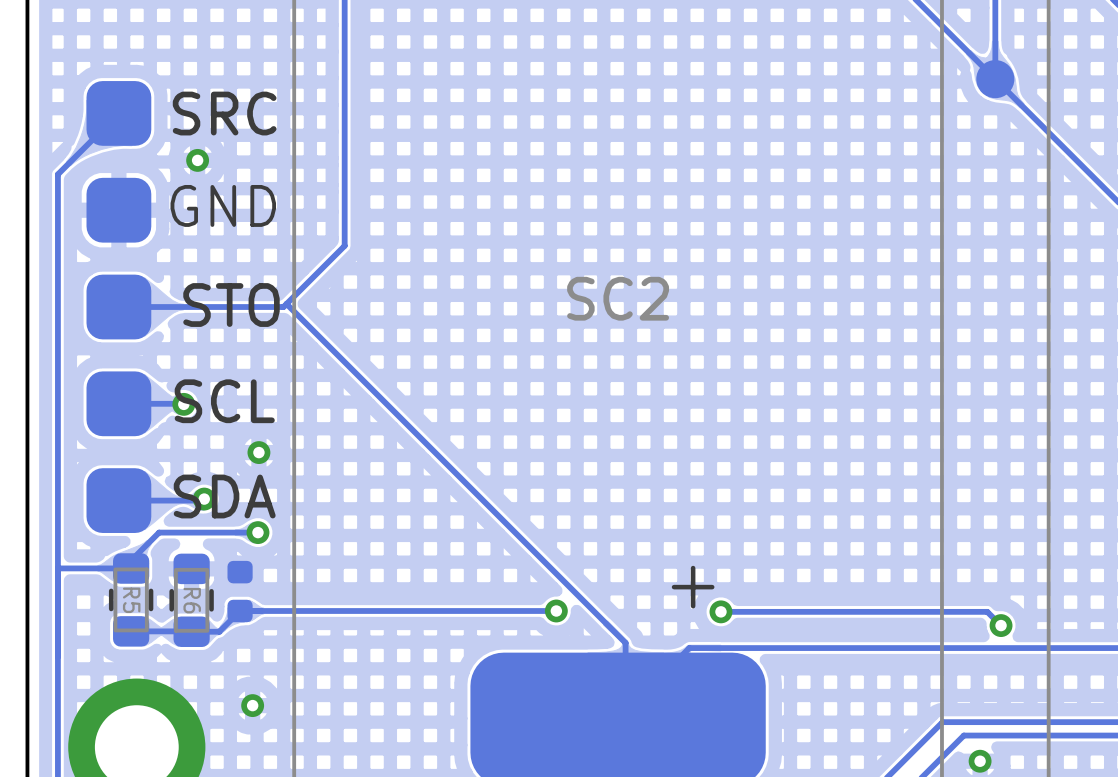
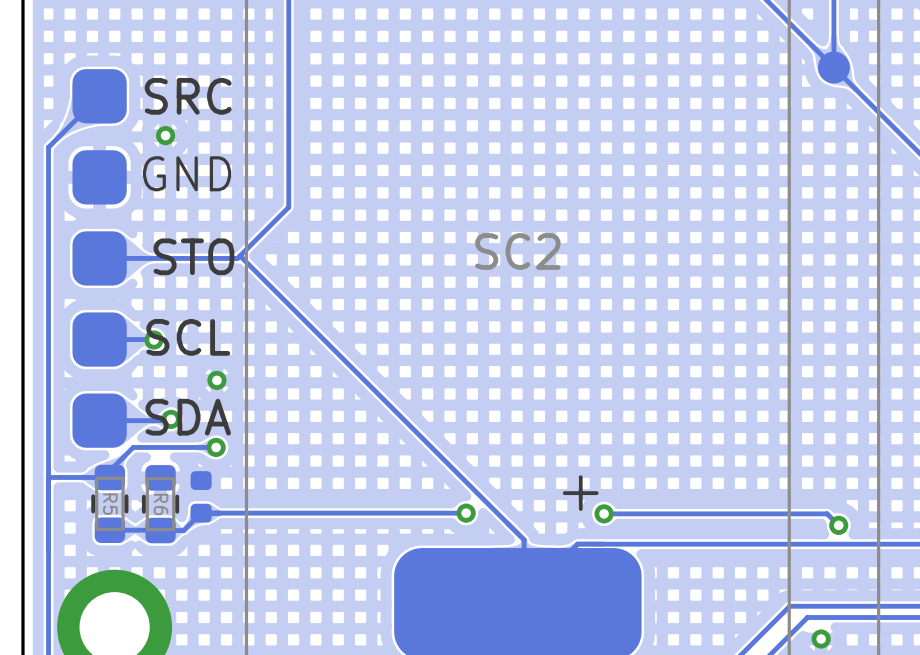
via: (252, 705) -> none

